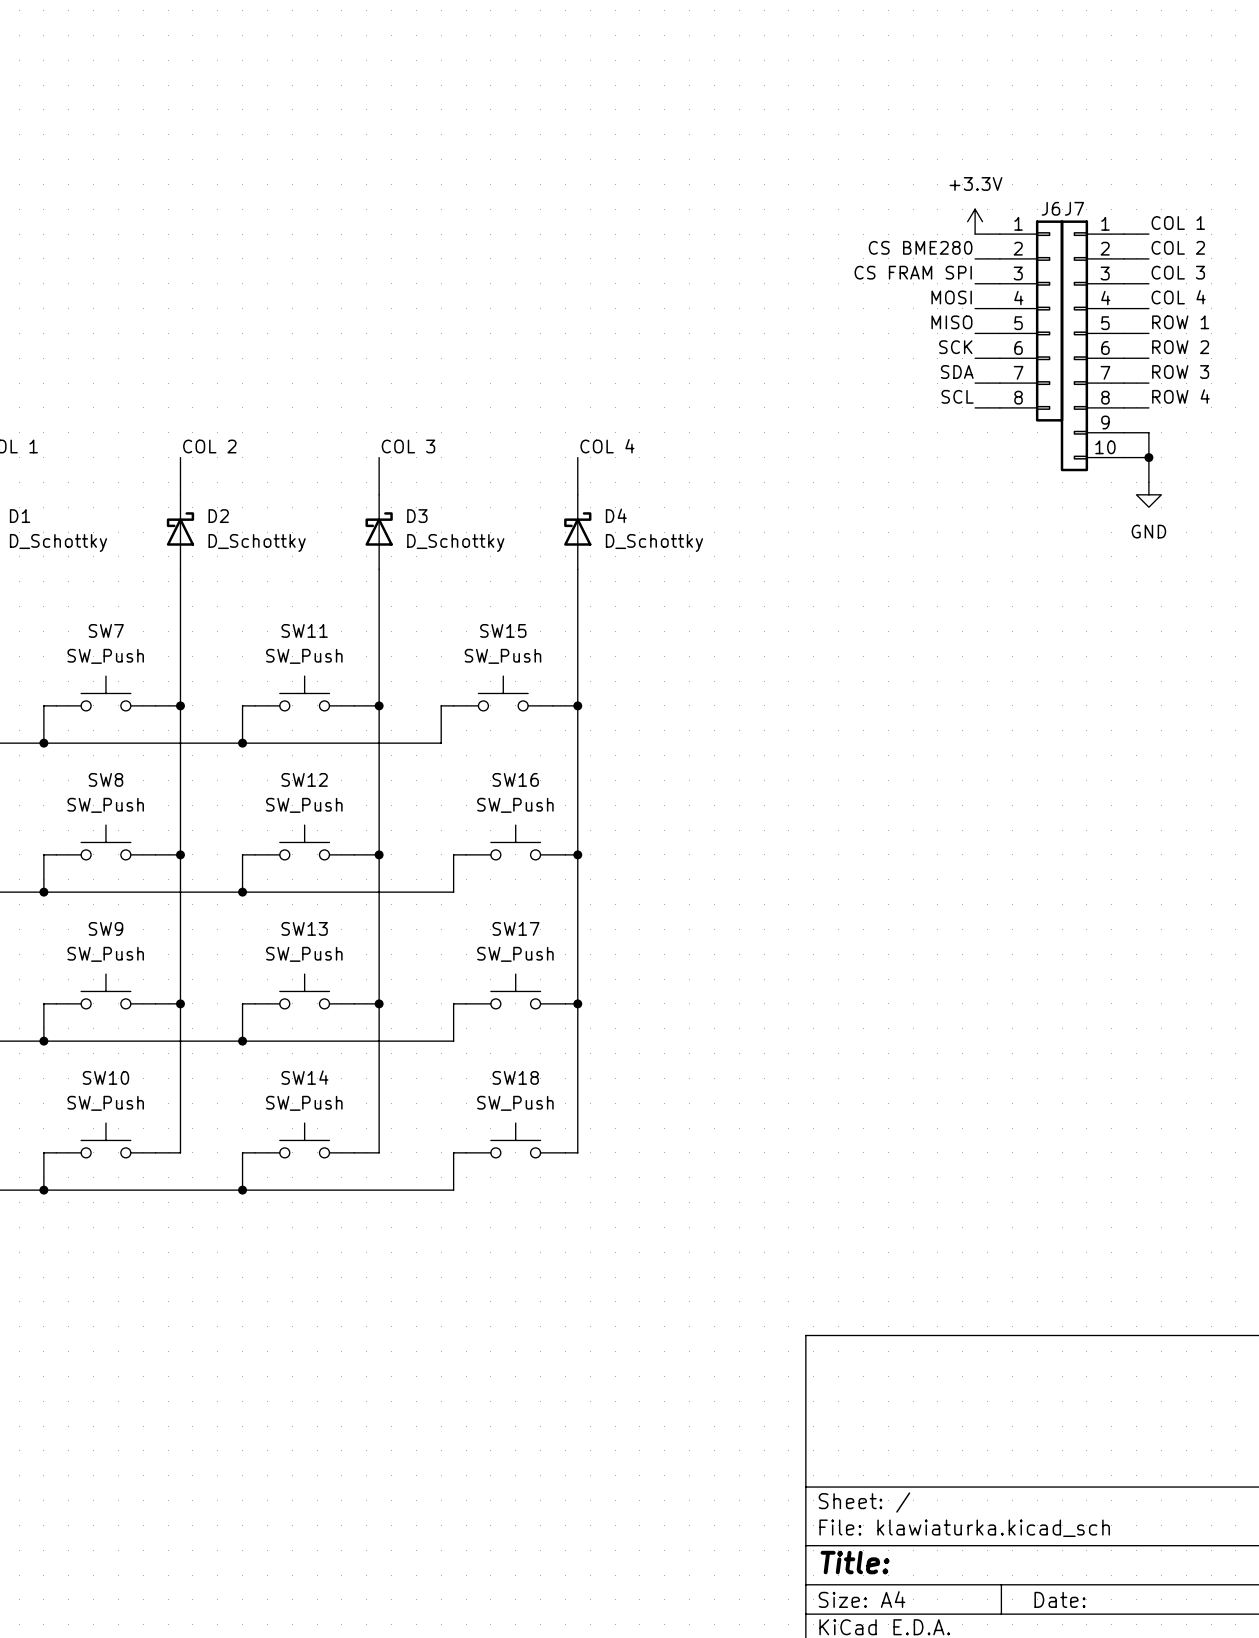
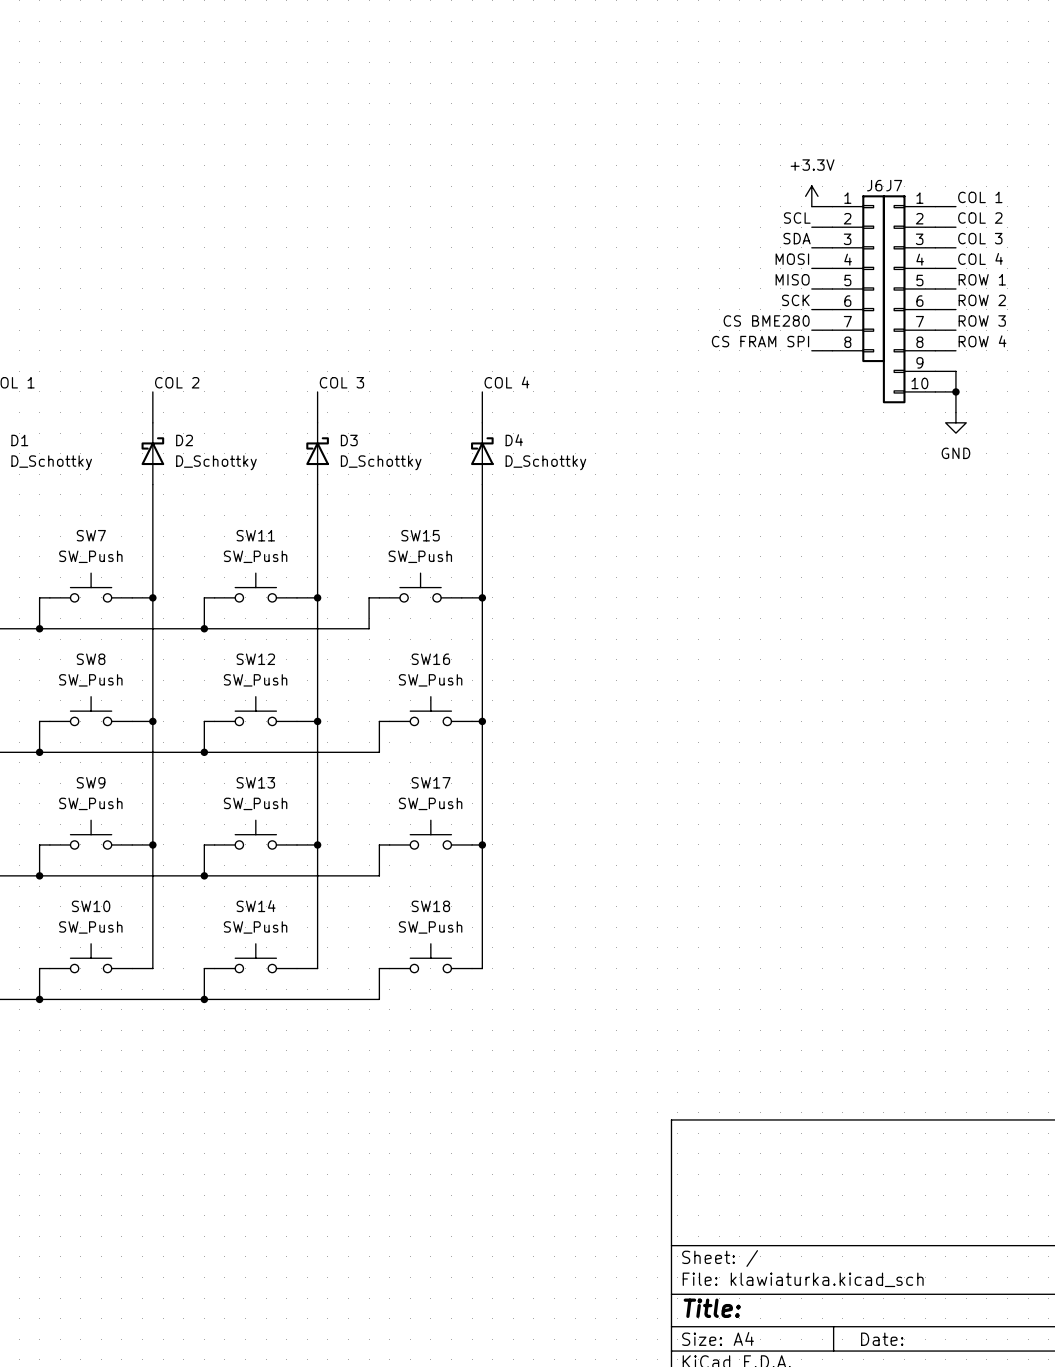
label: CS BME280 (920, 247) -> SCL (797, 218)
label: CS FRAM SPI (913, 272) -> SDA (797, 238)
label: SDA (957, 372) -> CS BME280 (766, 320)
label: SCL (957, 396) -> CS FRAM SPI (760, 341)

